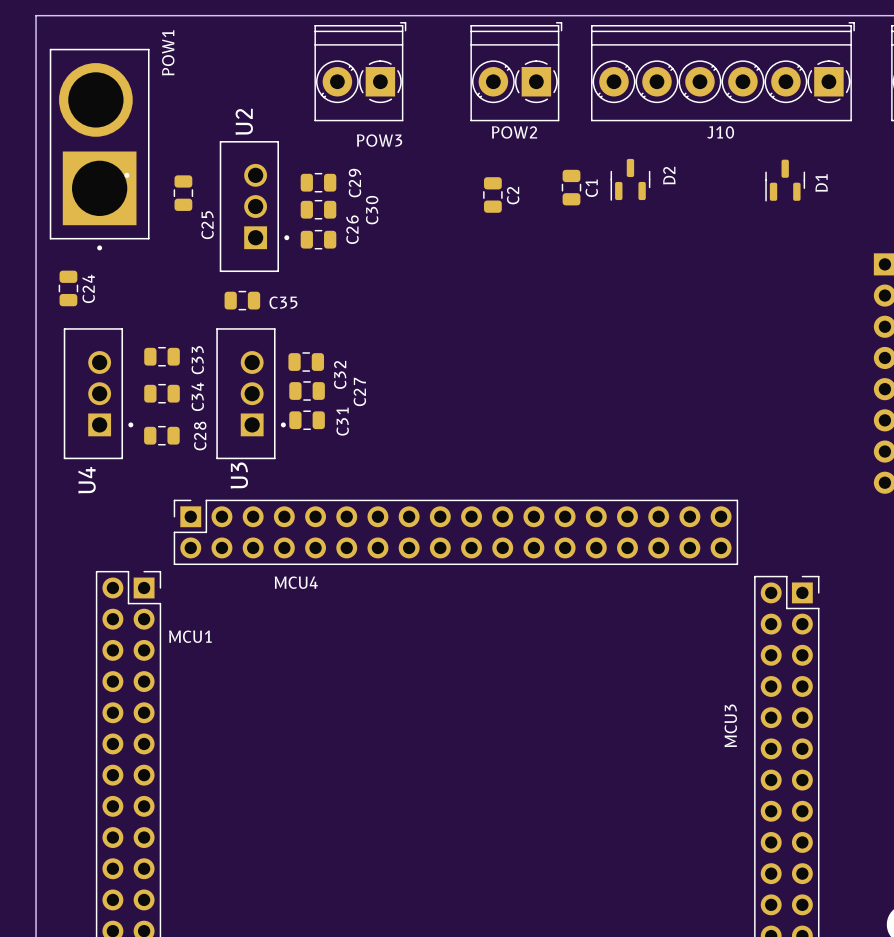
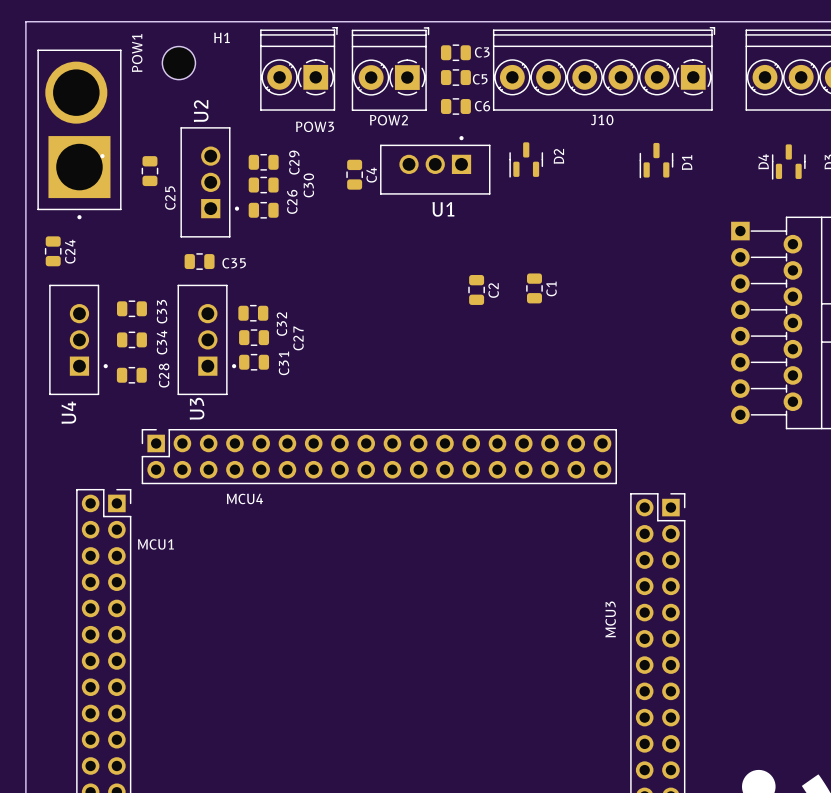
C3: none -> (455, 52)
H1: none -> (178, 63)
POW2 position: (516, 71) -> (390, 69)
C5: none -> (455, 77)
C6: none -> (455, 106)
U1: none -> (435, 165)
C1 position: (571, 187) -> (534, 288)
C2 position: (492, 194) -> (476, 289)
C4: none -> (354, 174)

